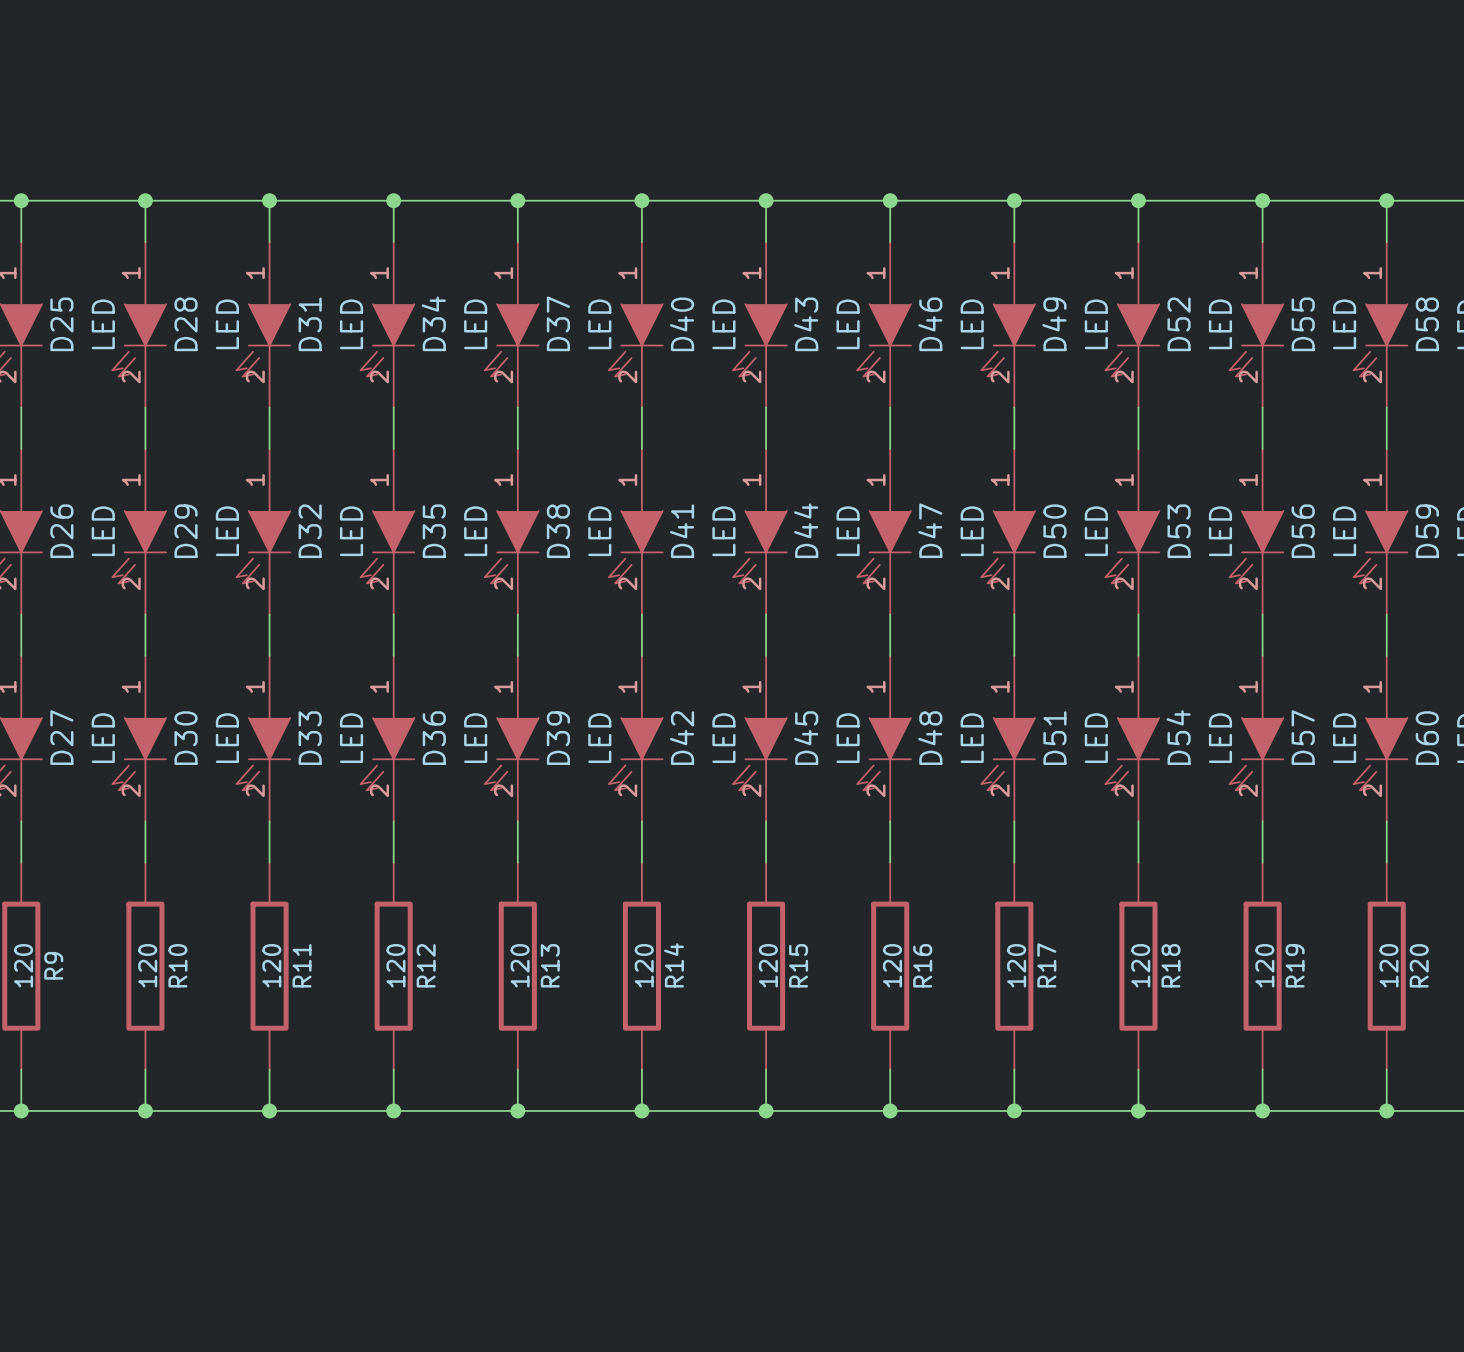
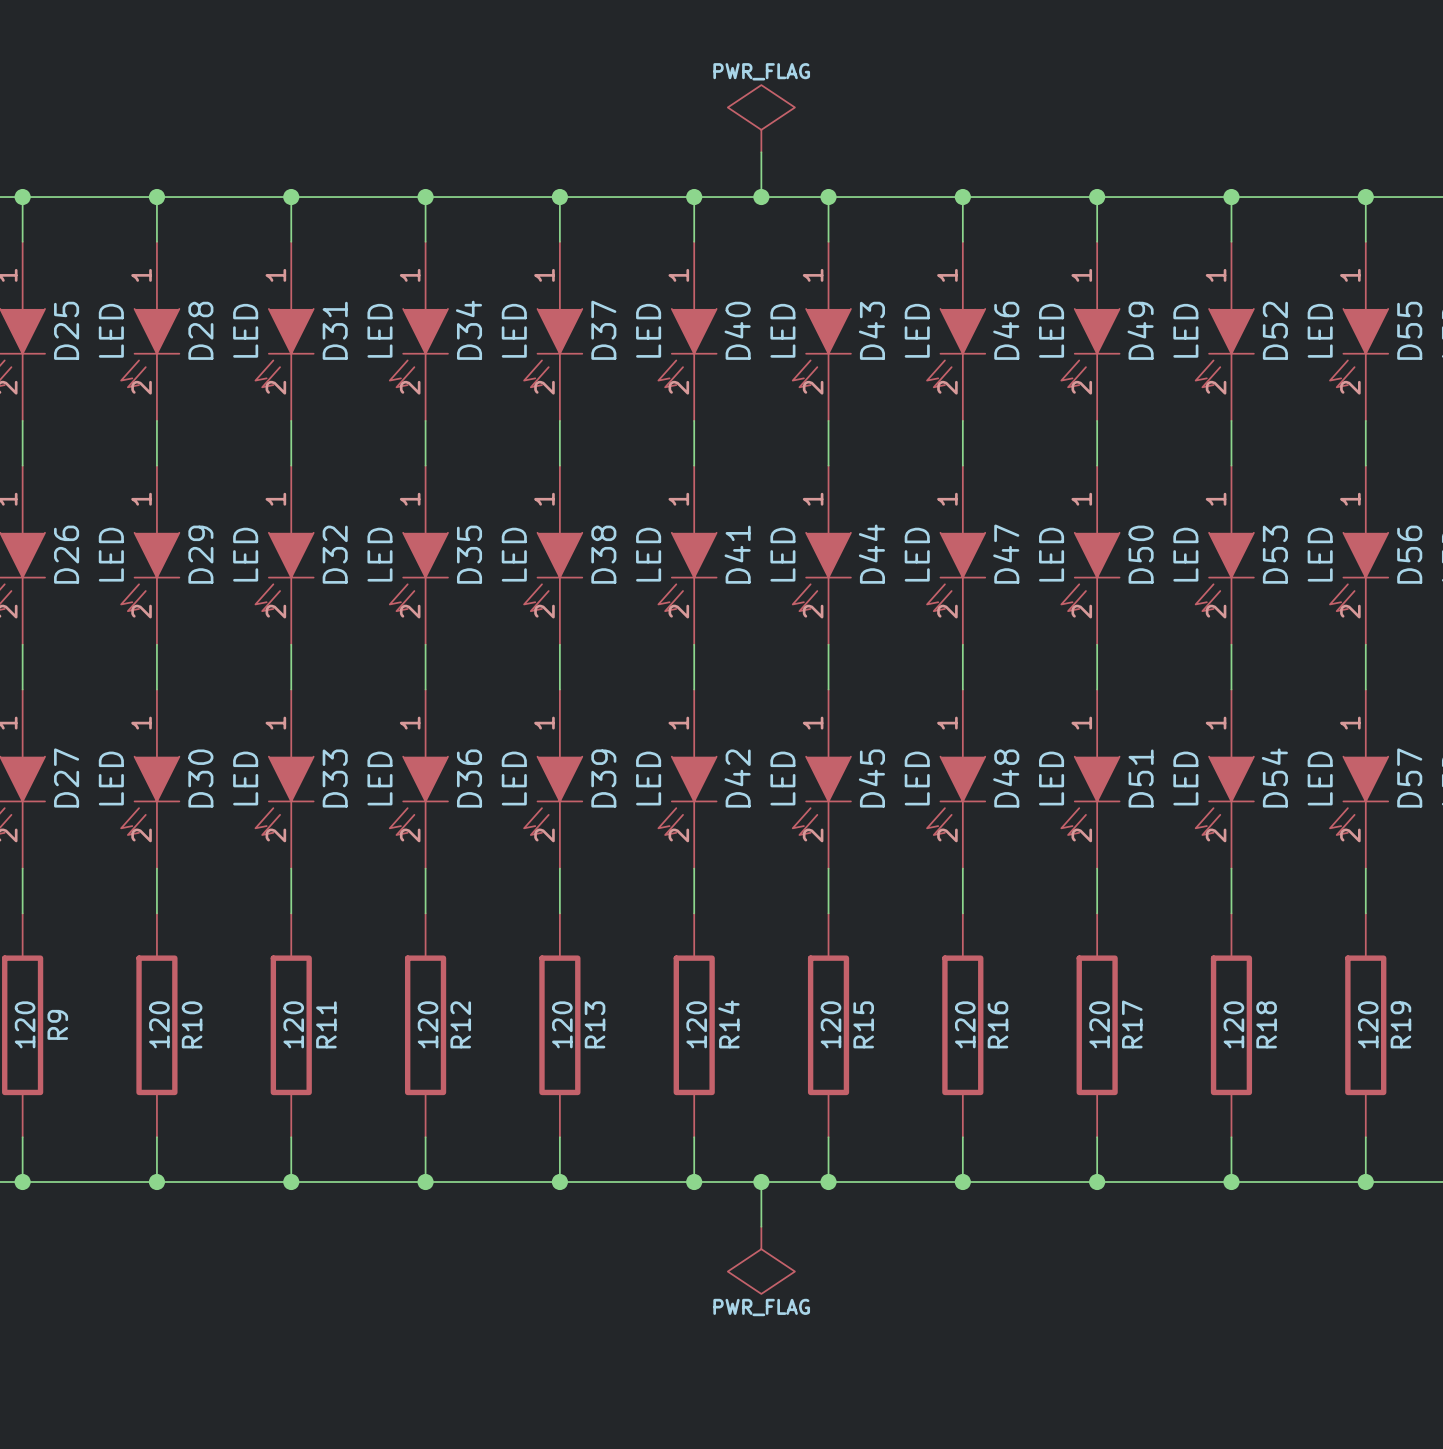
power symbol: none -> PWR_FLAG (761, 118)
wire: none -> (761, 152) (761, 197)
junction: none -> (761, 197)
wire: none -> (761, 1182) (761, 1226)
junction: none -> (761, 1182)
power symbol: none -> PWR_FLAG (761, 1260)

